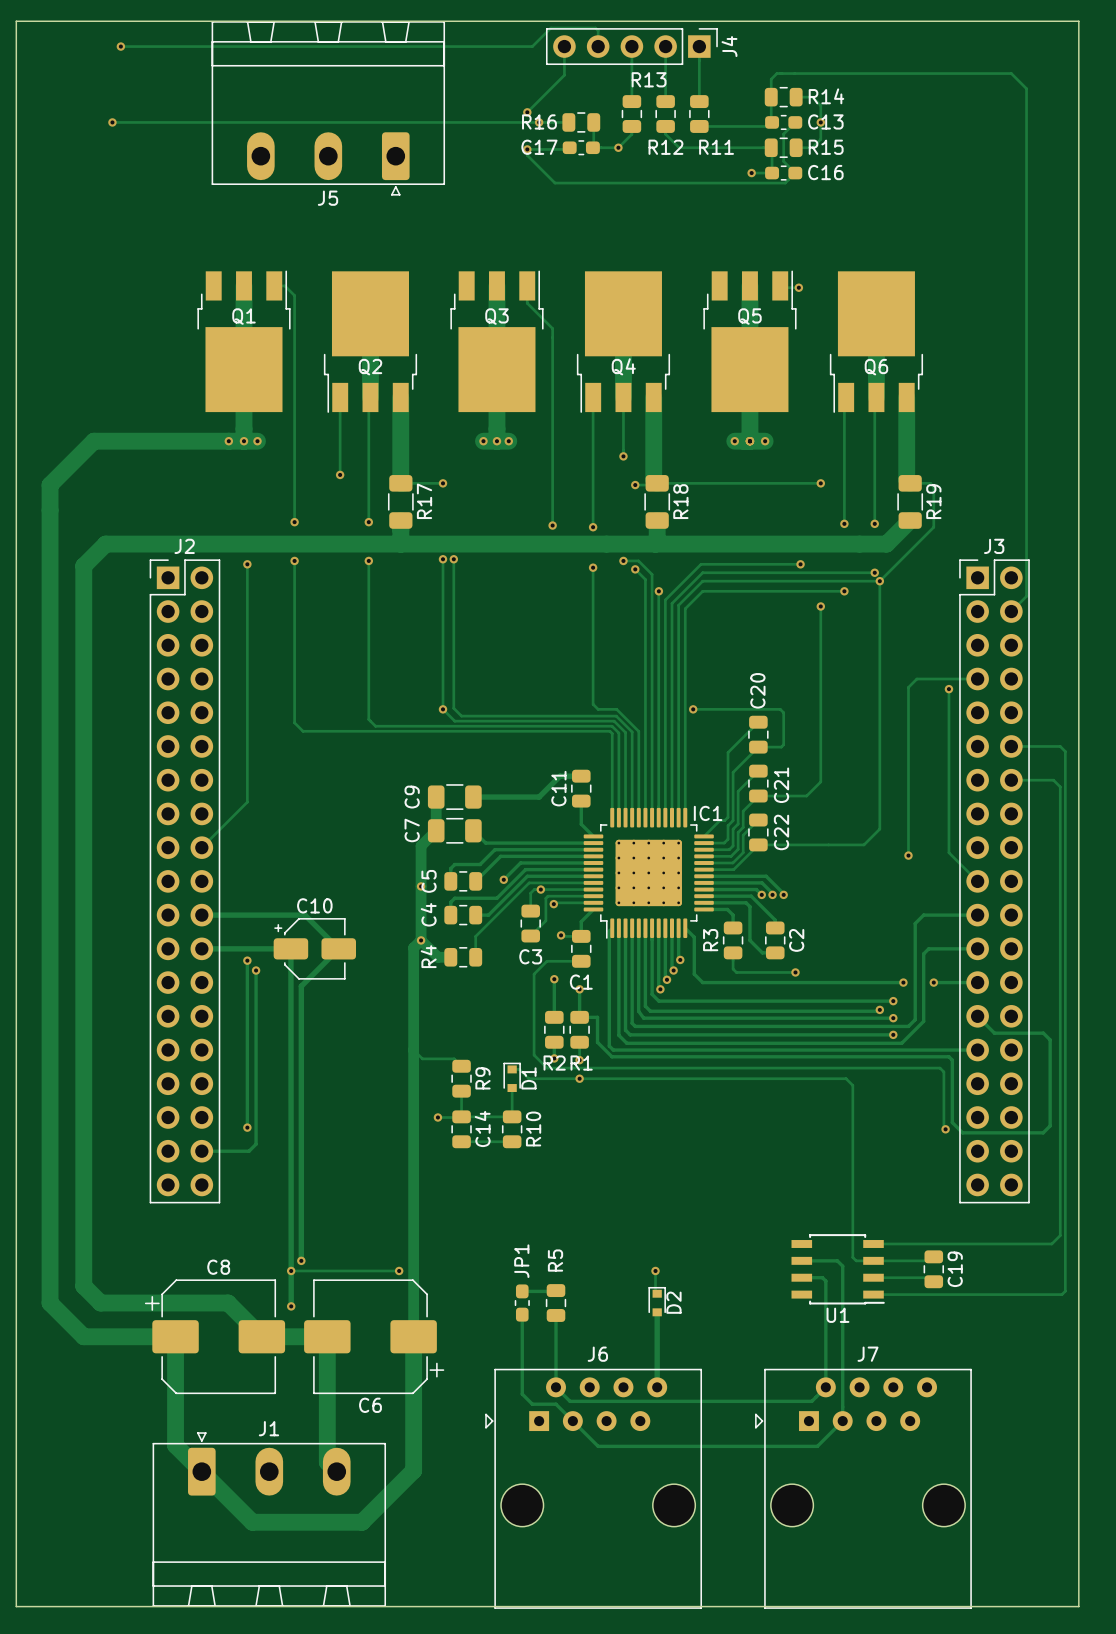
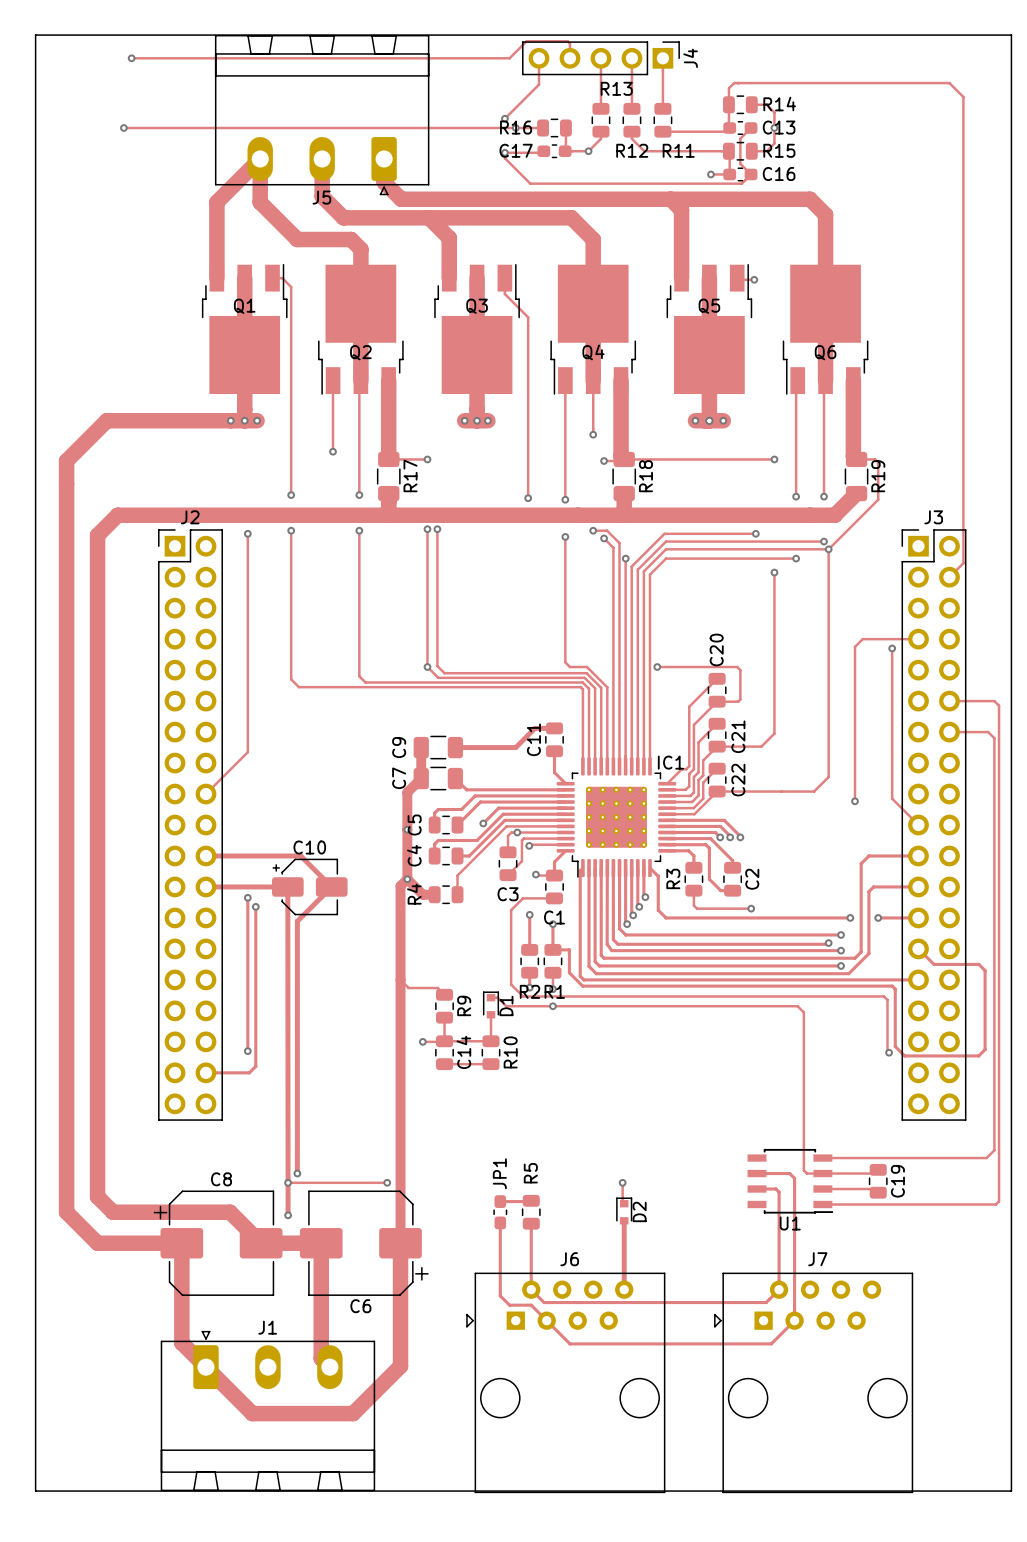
track: none -> (384, 158) (384, 182) (401, 199) (810, 199) (825, 214) (825, 303)
track: none -> (322, 168) (322, 196) (343, 217) (571, 217) (593, 239) (593, 303)
track: none -> (670, 199) (681, 210) (681, 278)
track: none -> (429, 217) (449, 238) (449, 278)
track: none -> (216, 278) (216, 202) (260, 158) (260, 202) (297, 239) (351, 239) (360, 249) (360, 303)

